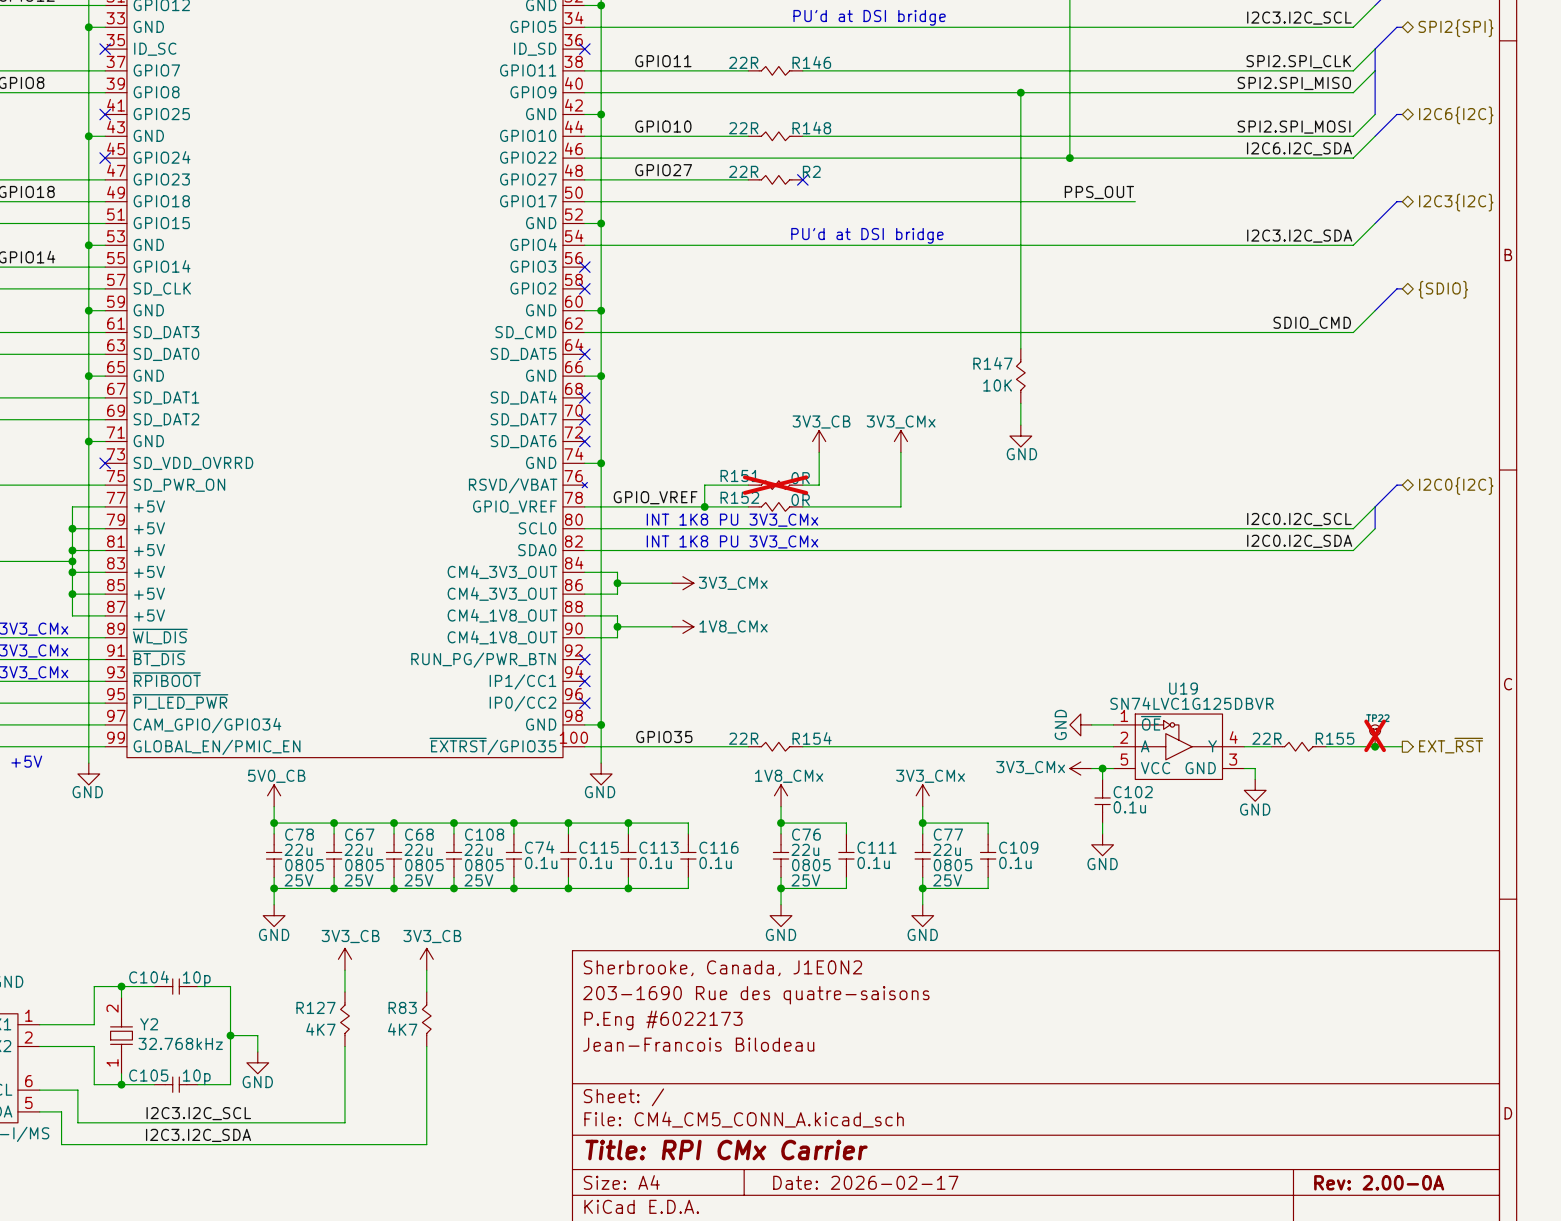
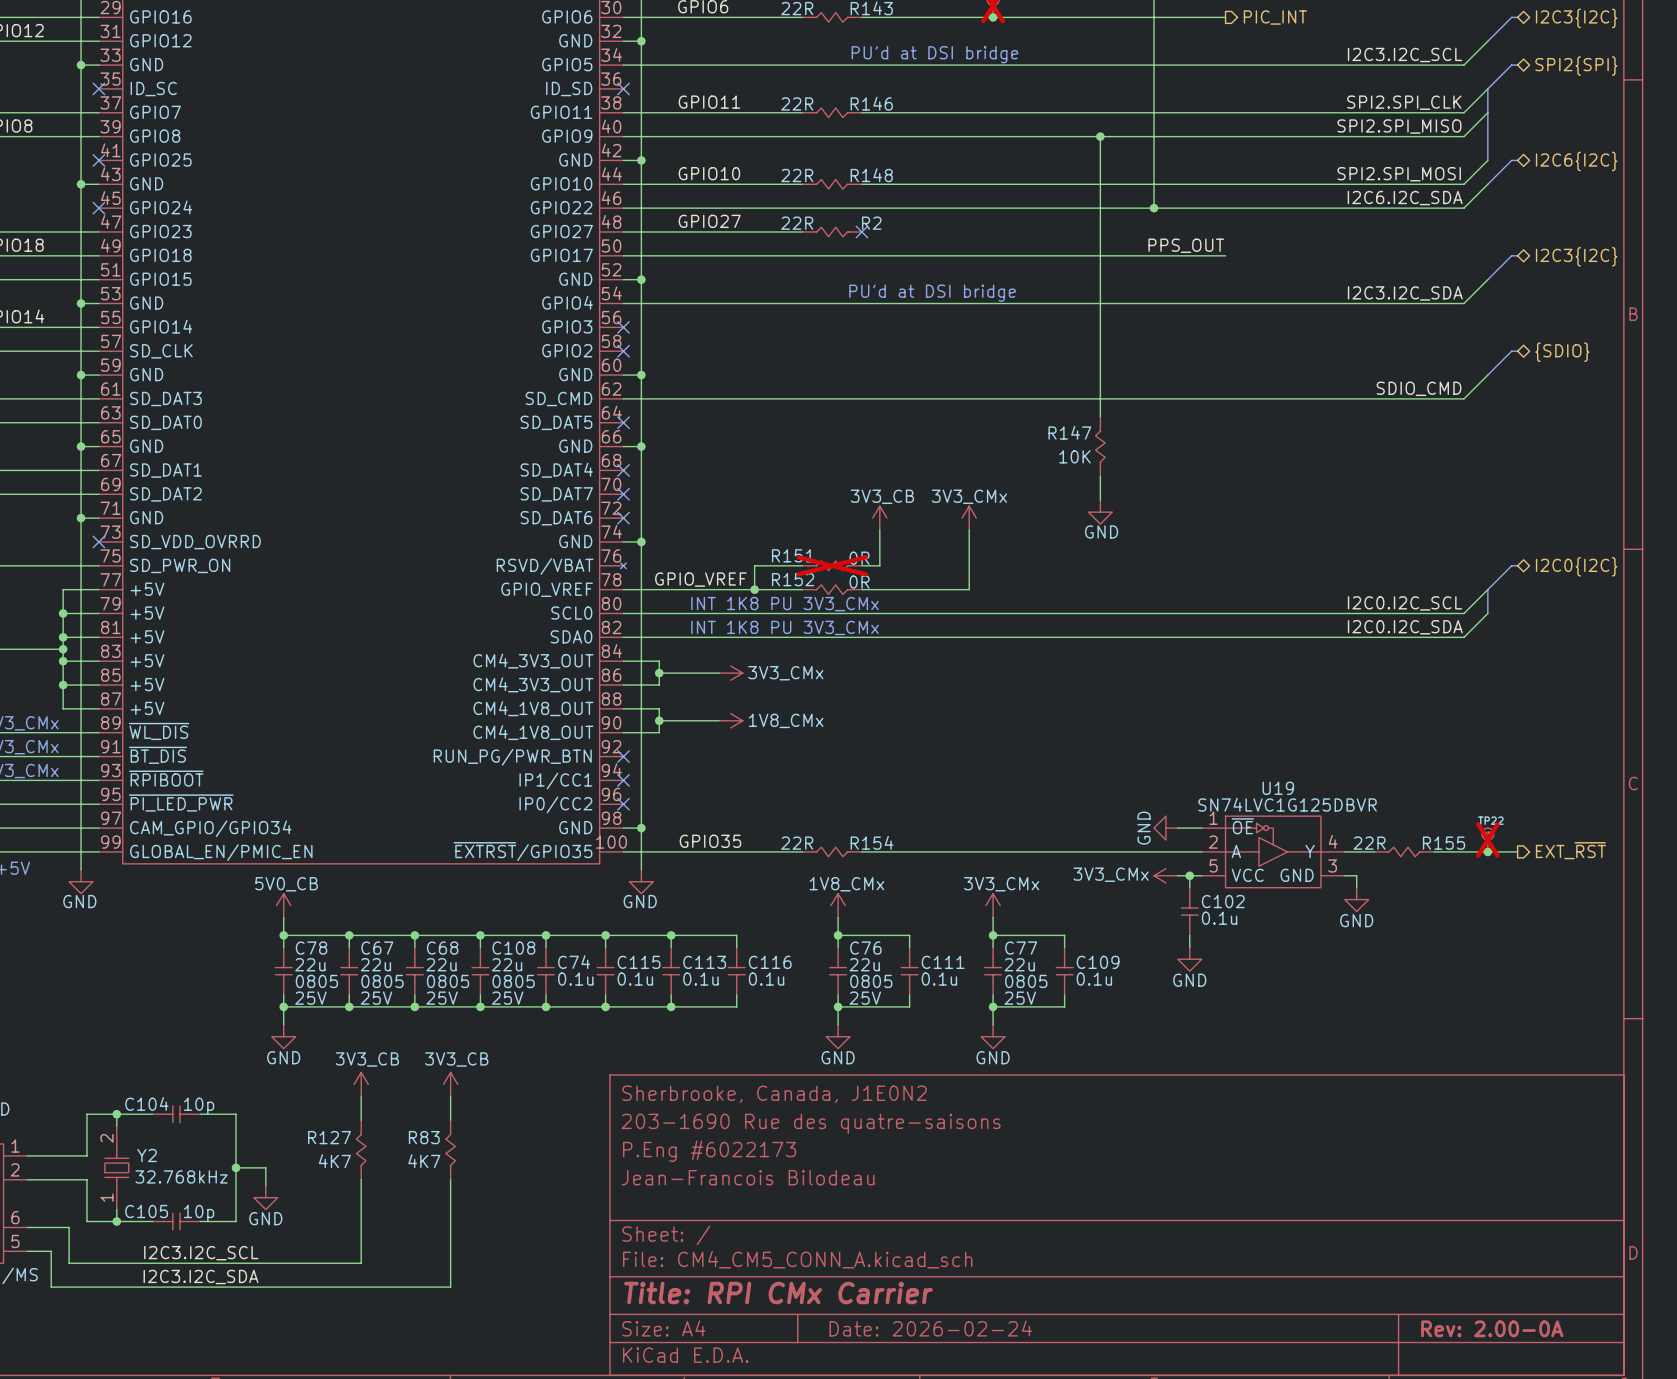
title block: Date: 2026-02-17 (865, 1182) -> Date: 2026-02-24 (930, 1328)

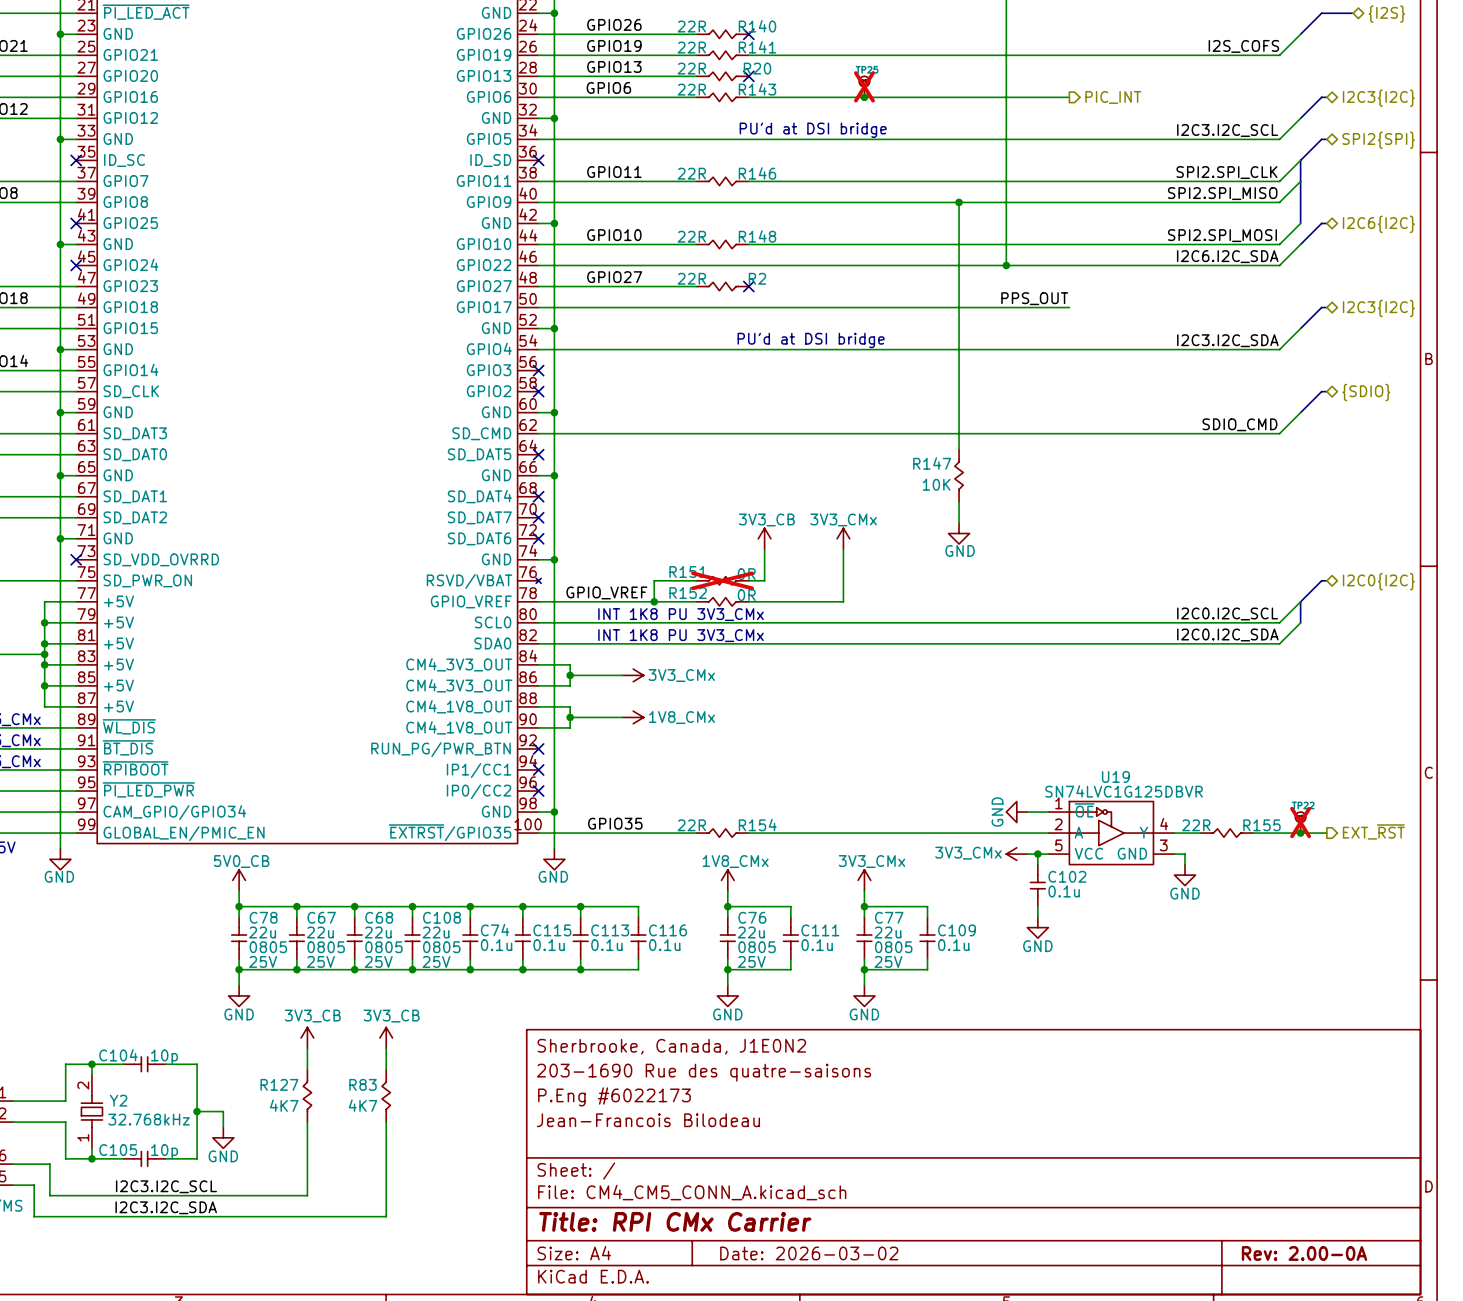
title block: Date: 2026-02-24 (930, 1328) -> Date: 2026-03-02 (809, 1253)

